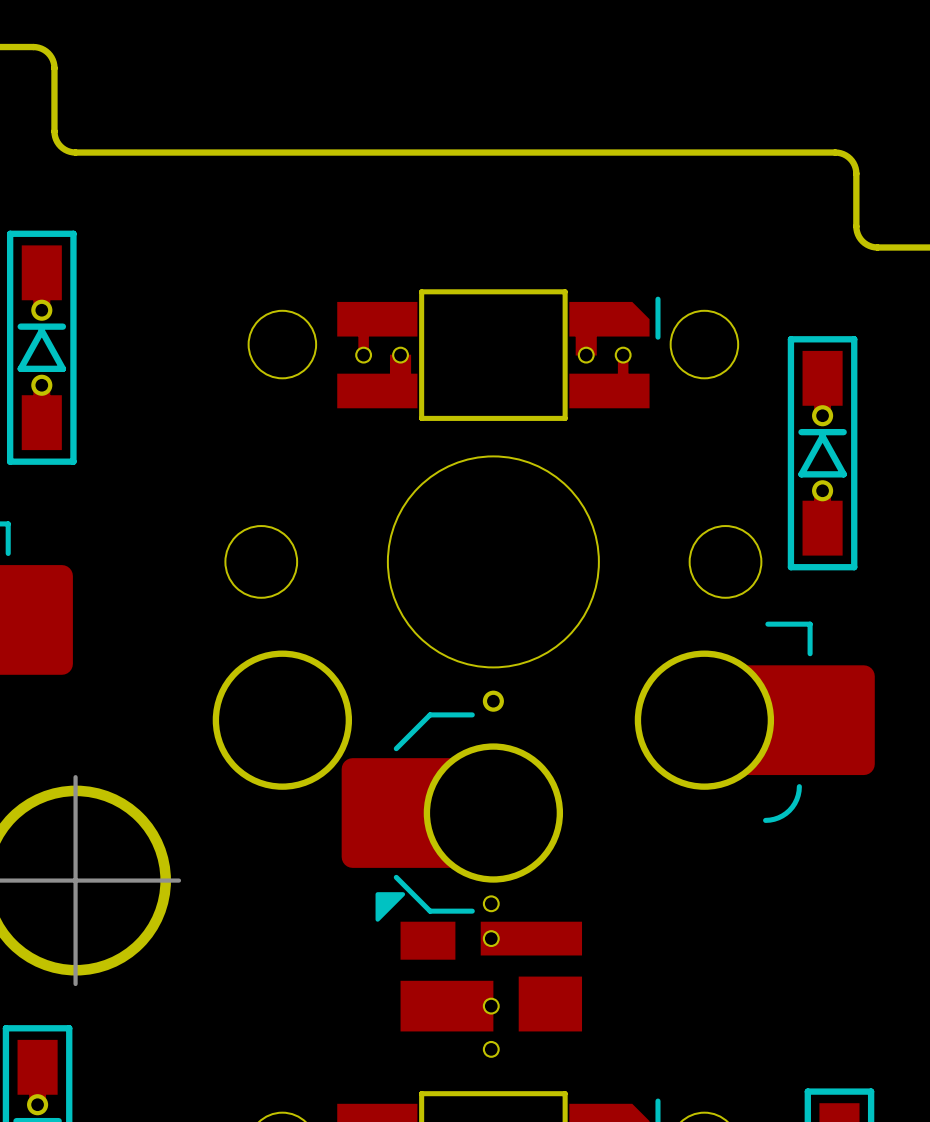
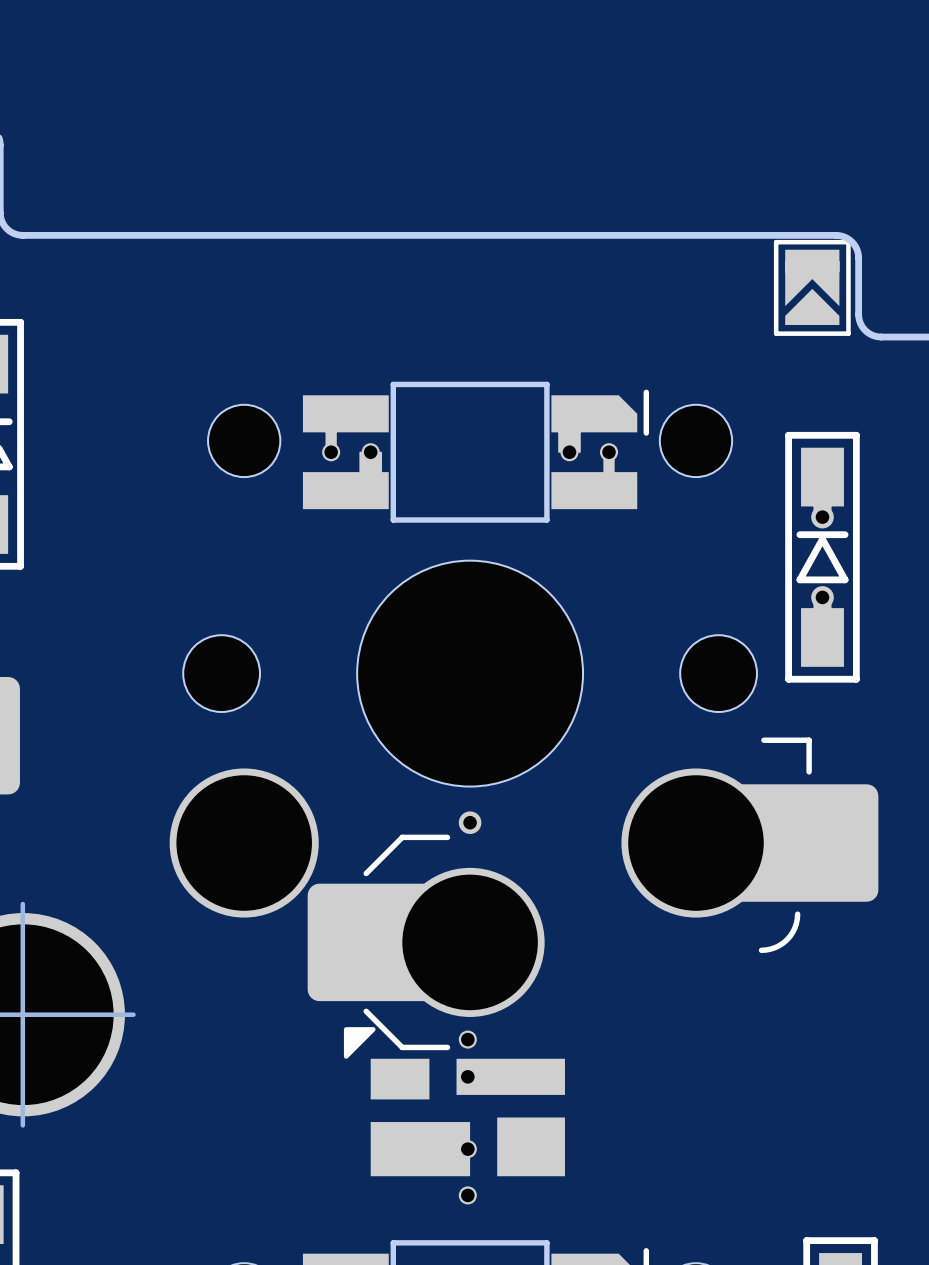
line: none -> (776, 242) (848, 242) (848, 333) (776, 333) (776, 242)
part: none -> (812, 287)

